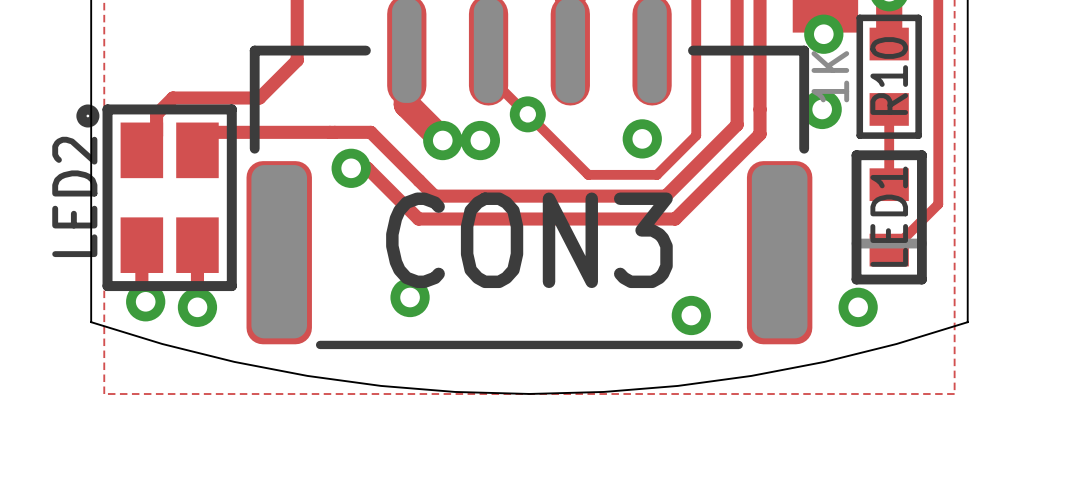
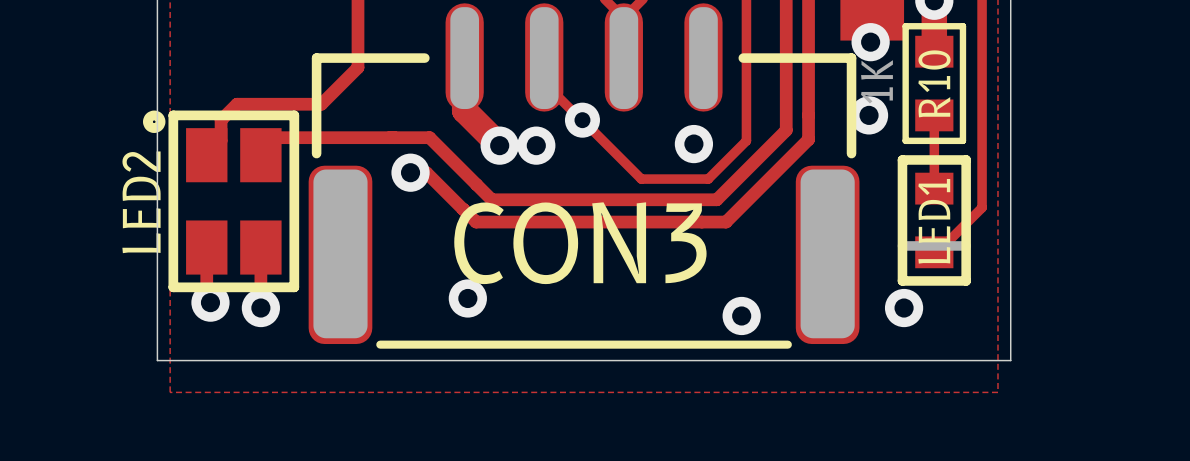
board edge: (91, 322) (162, 343) (234, 361) (307, 375) (381, 385) (455, 391) (529, 393) (603, 391) (677, 385) (751, 375) (824, 361) (896, 343) (967, 322) -> (157, 322) (157, 360) (1010, 360) (1010, 322)

